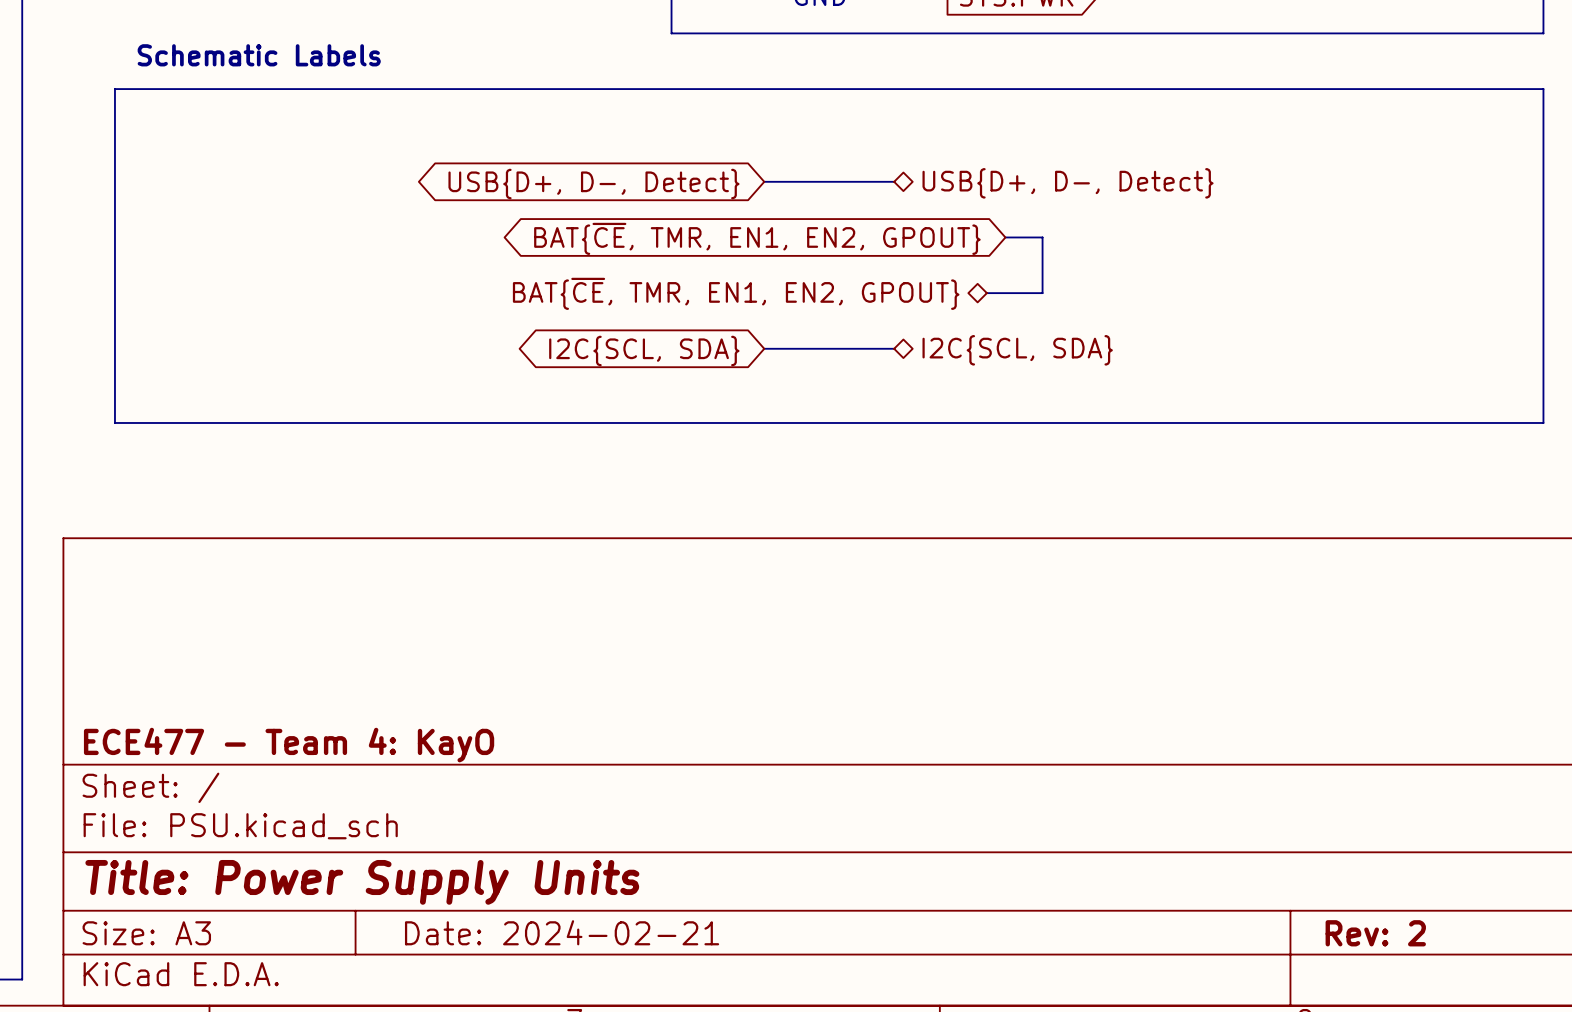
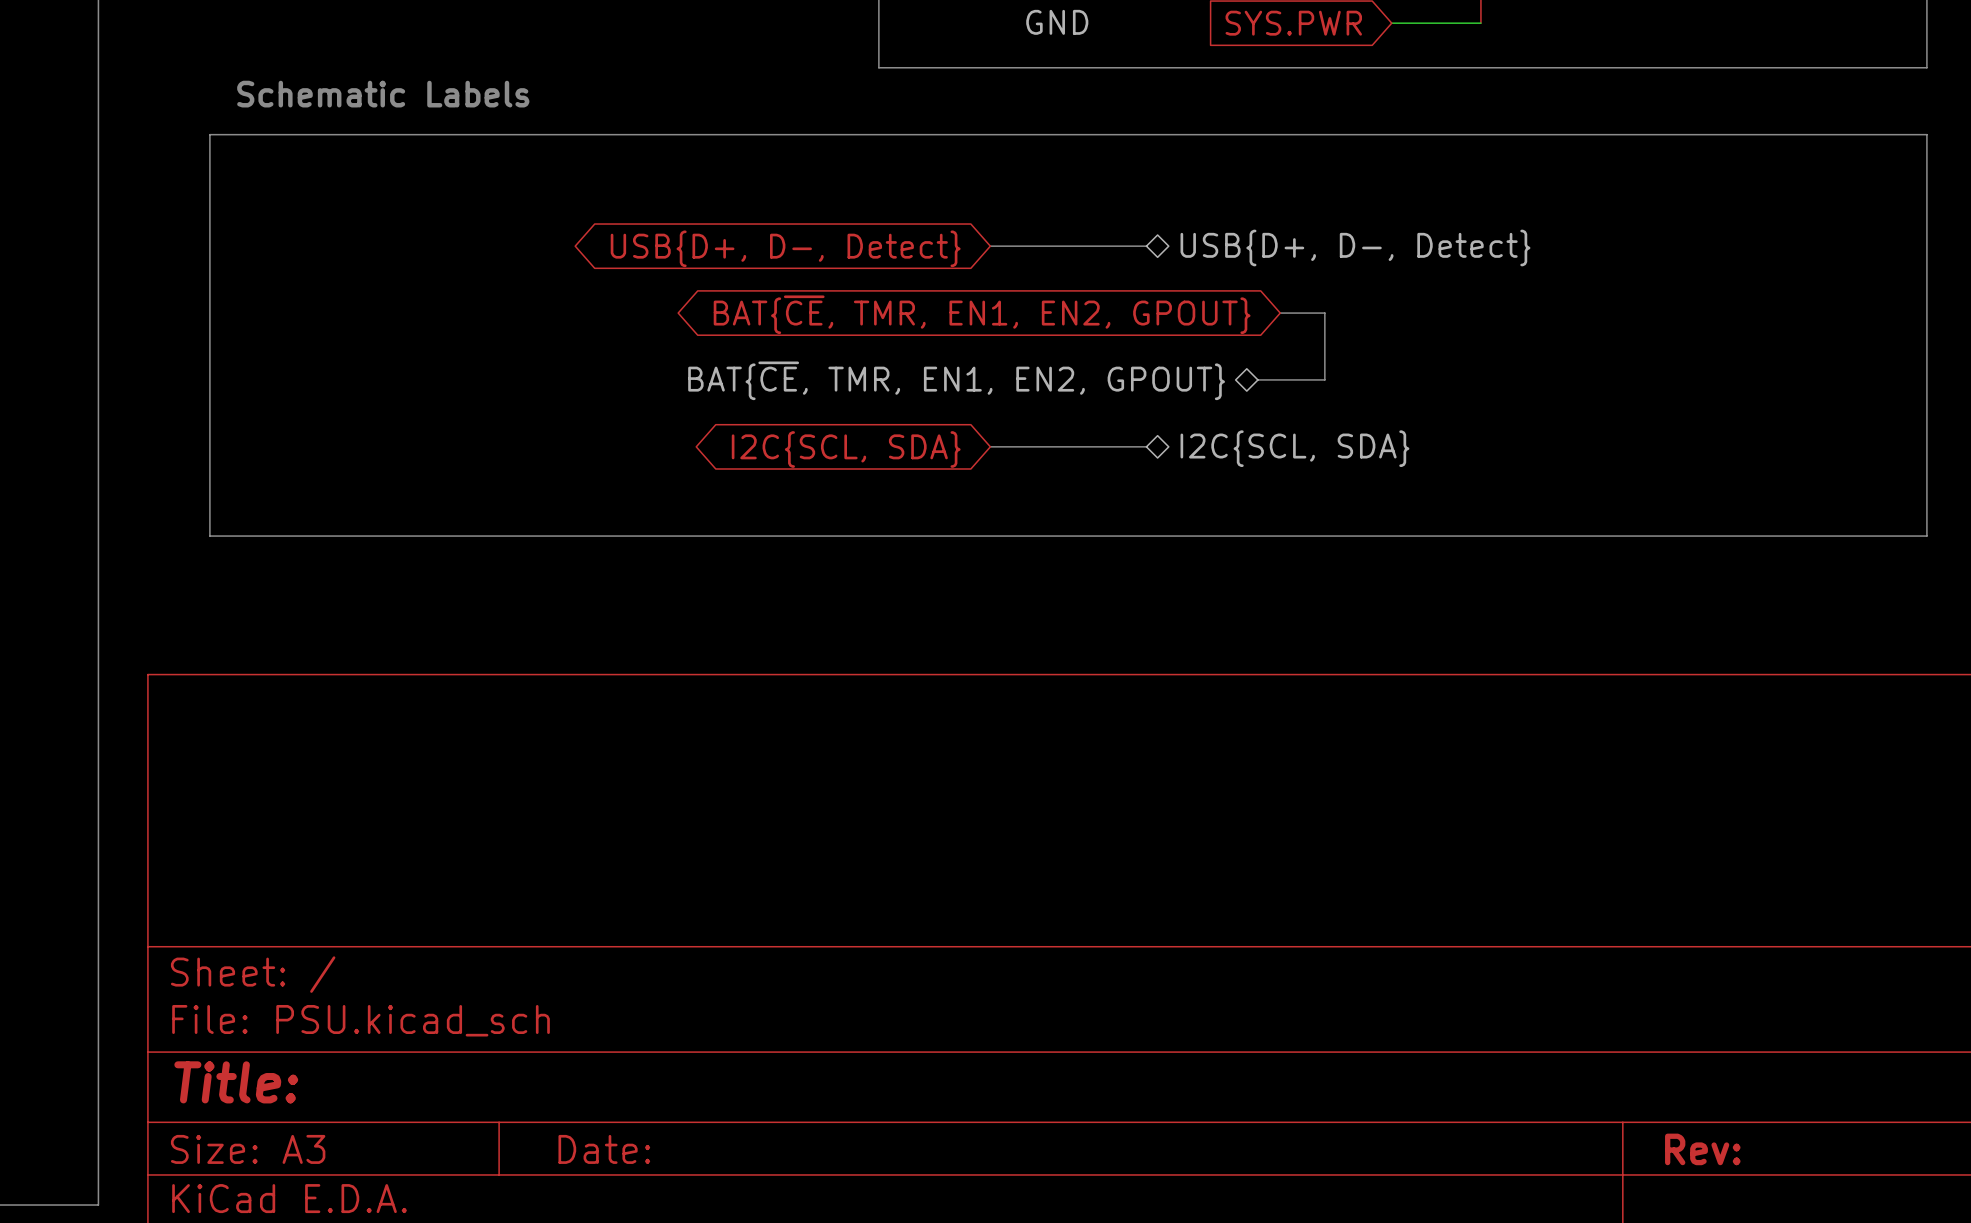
title block: ECE477 - Team 4: KayO (289, 745) -> none
title block: Title: Power Supply Units (362, 882) -> Title: (236, 1082)
title block: Date: 2024-02-21 (562, 932) -> Date: (604, 1149)
title block: Rev: 2 (1375, 933) -> Rev: (1702, 1149)

